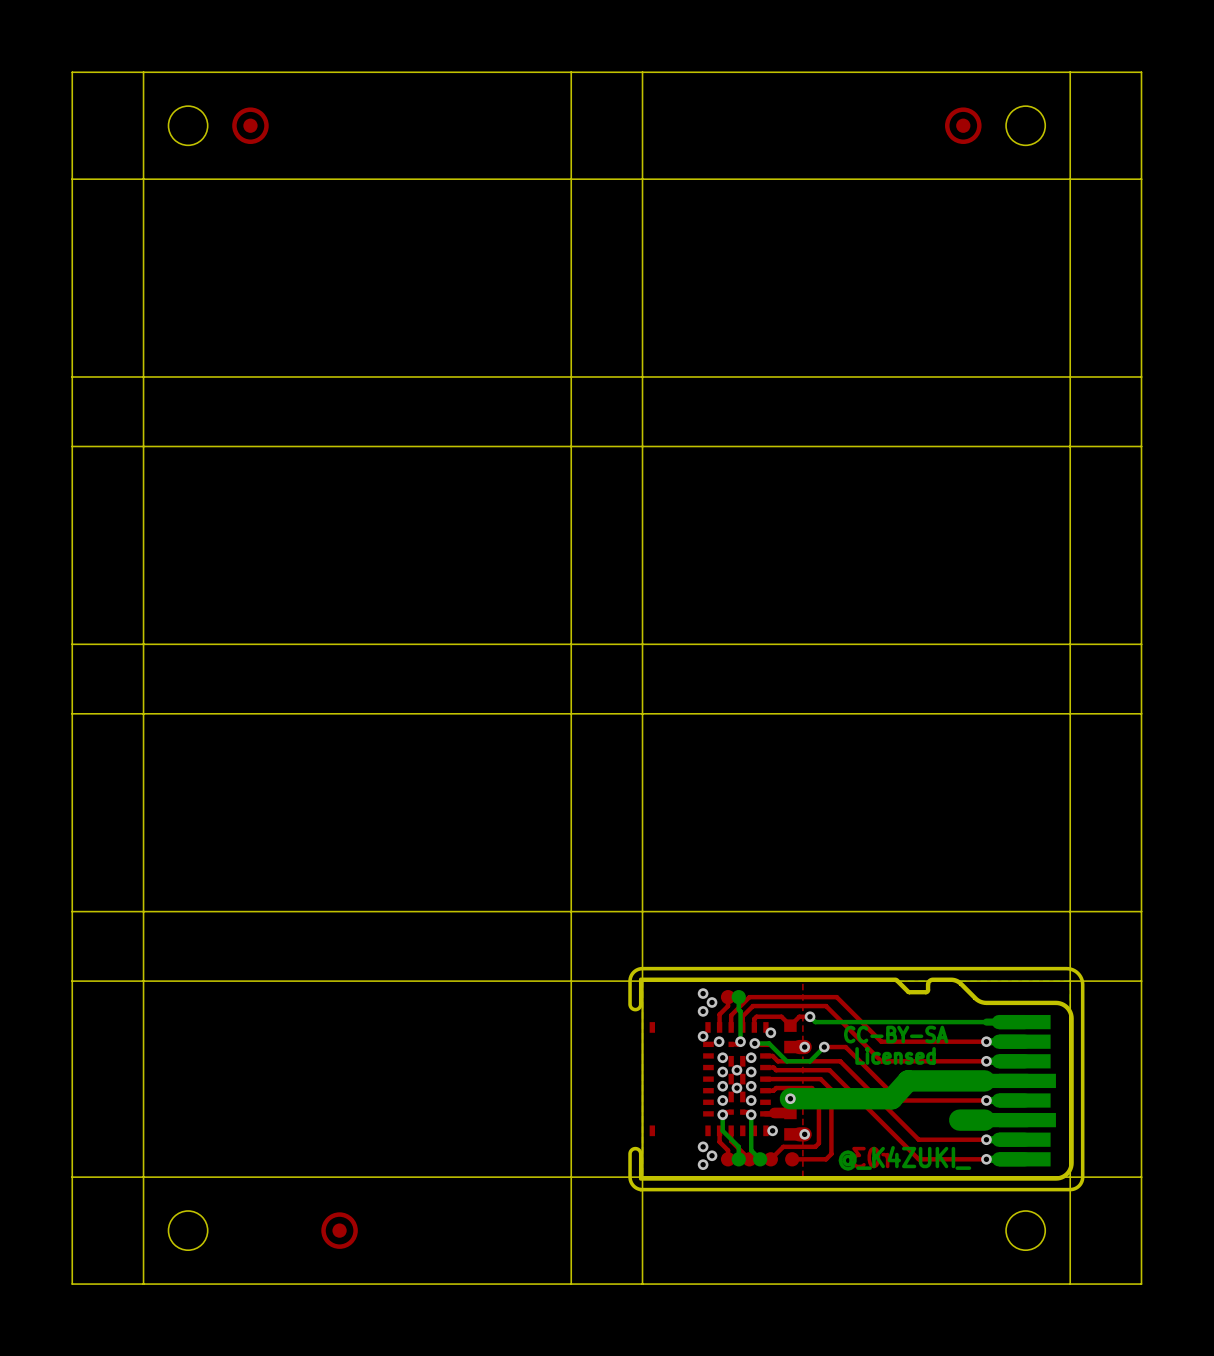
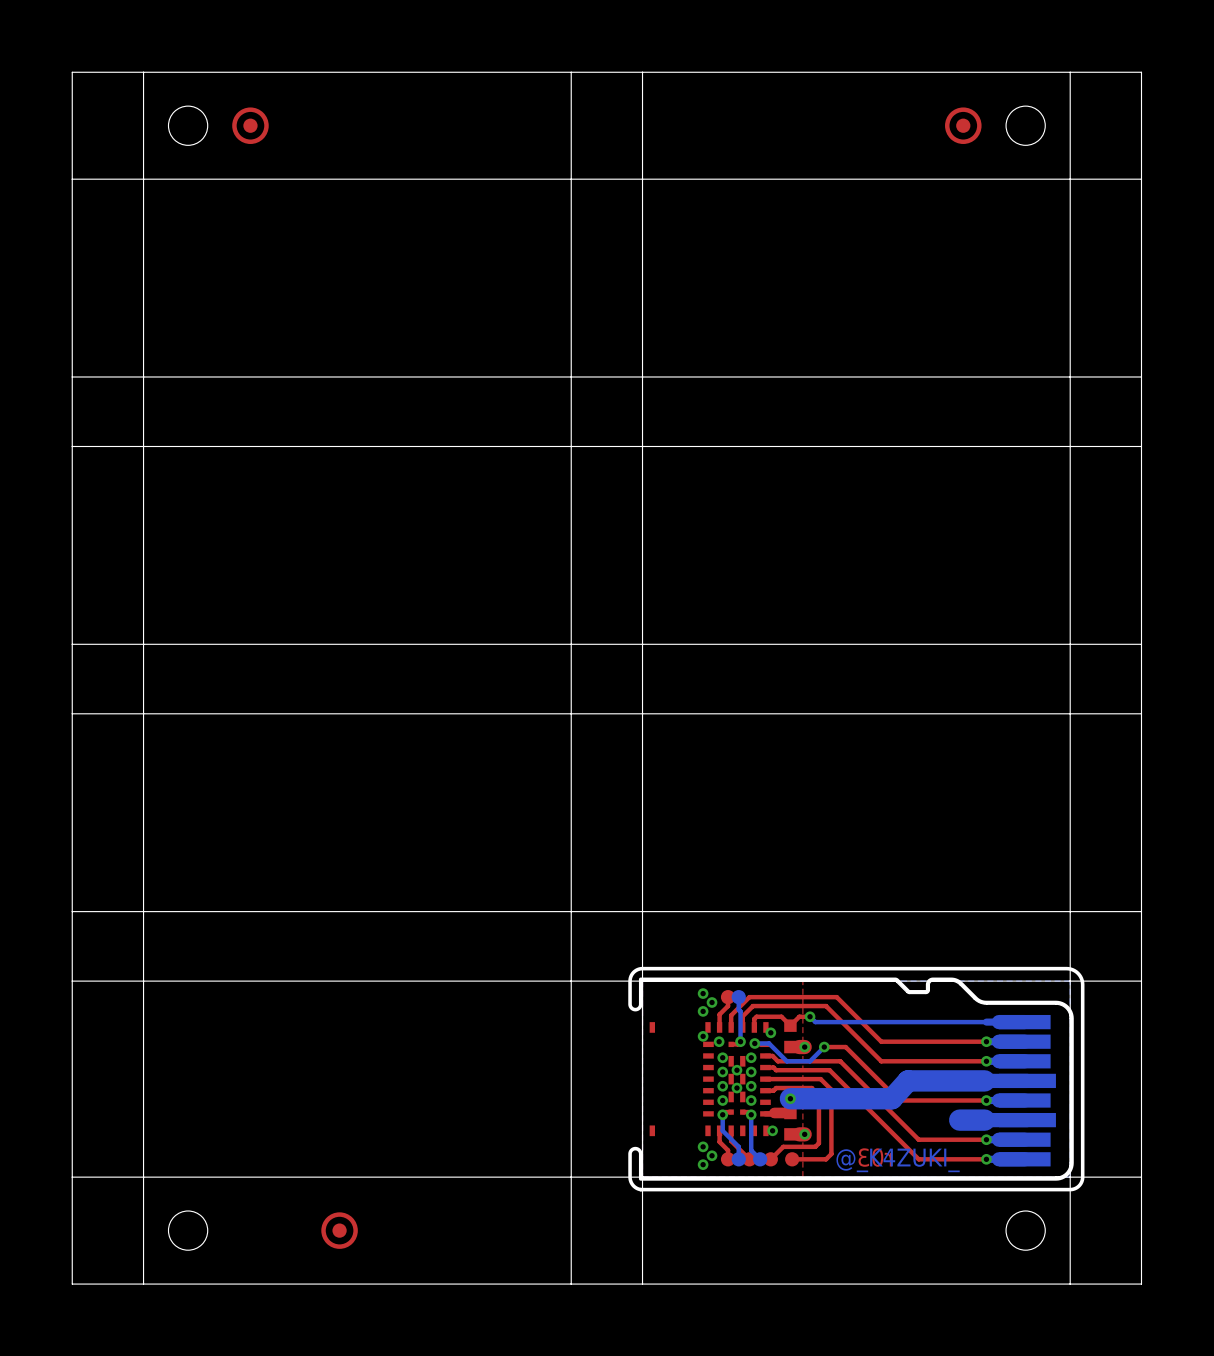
text: CC-BY-SA (896, 1034) -> none
text: Licensed (895, 1055) -> none

